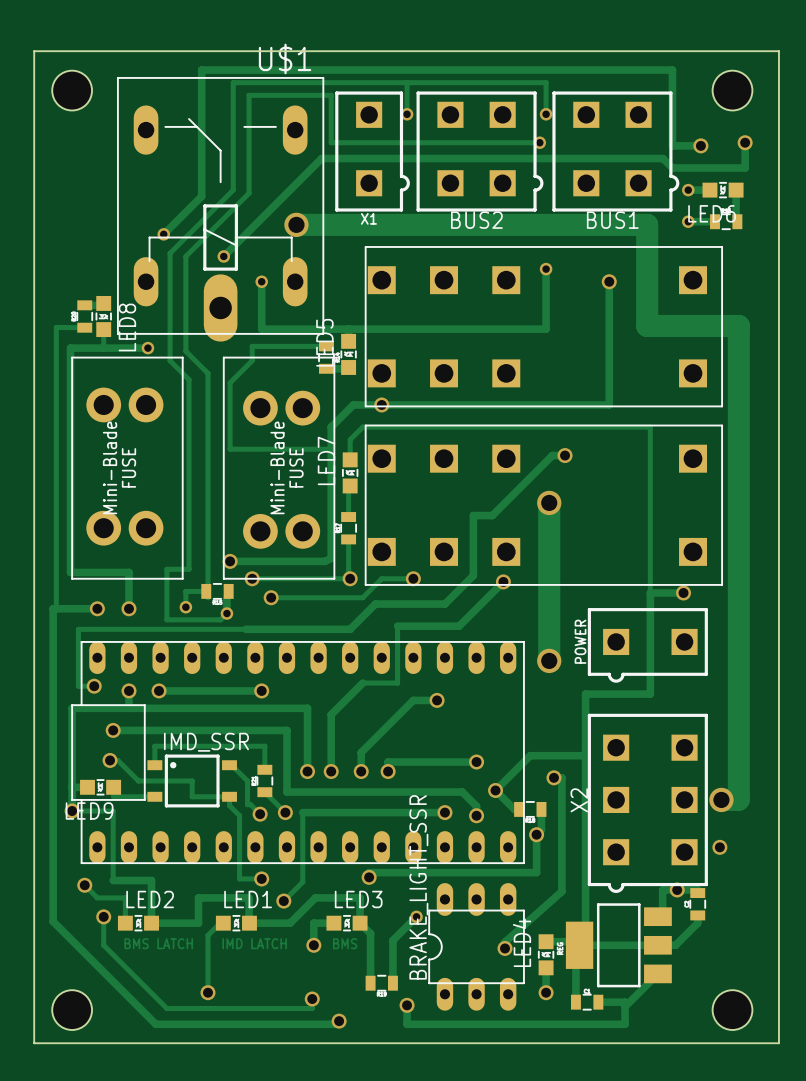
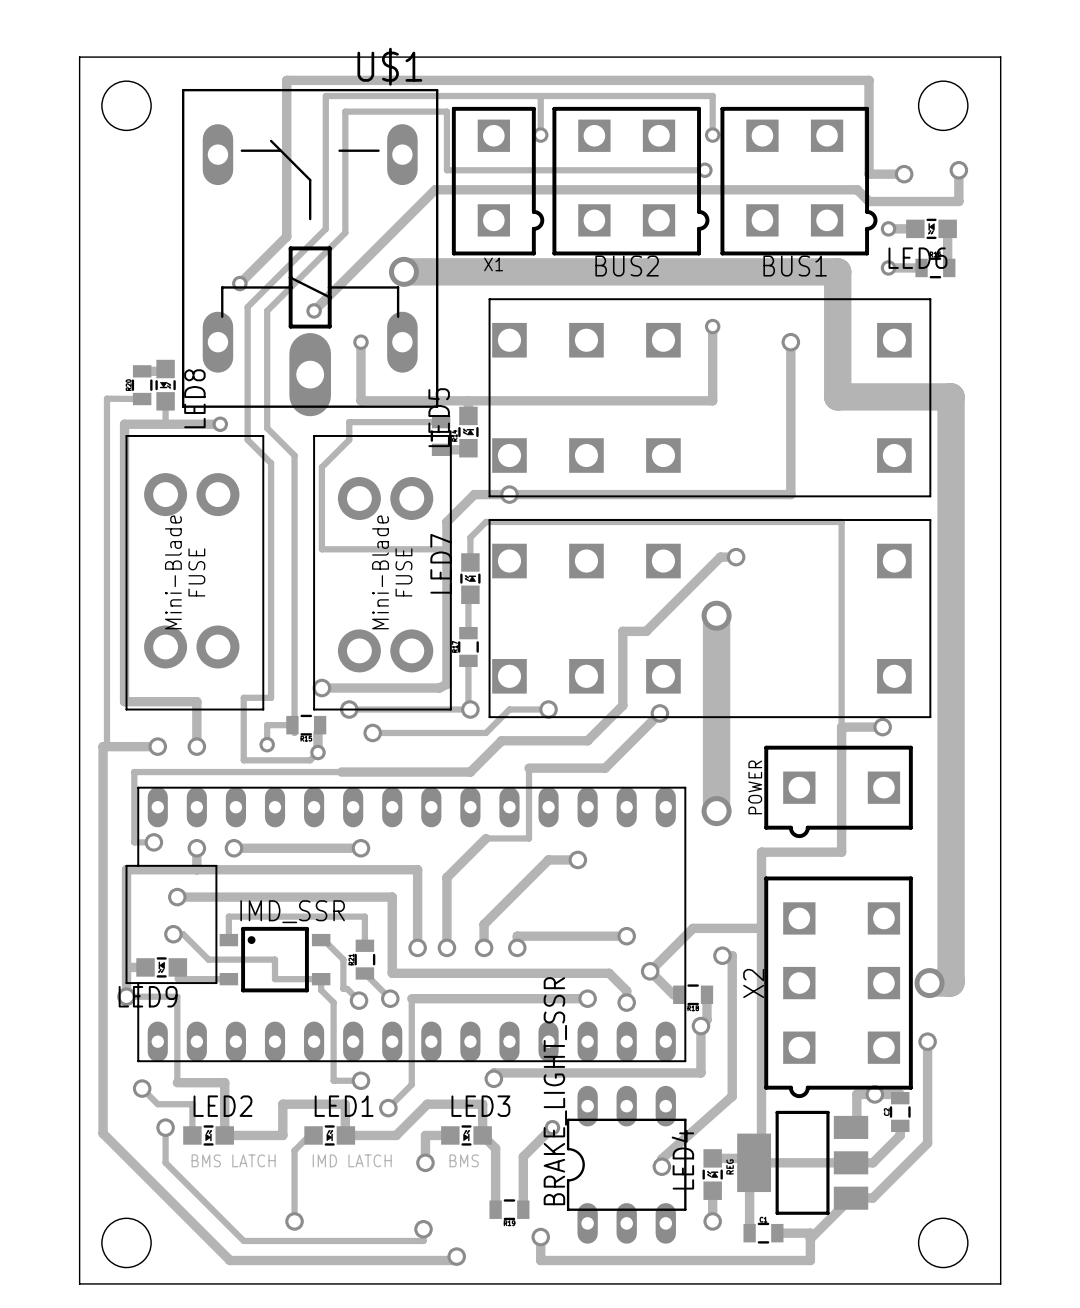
track: none -> (927, 1041) (927, 1143) (872, 1197) (851, 1197)

